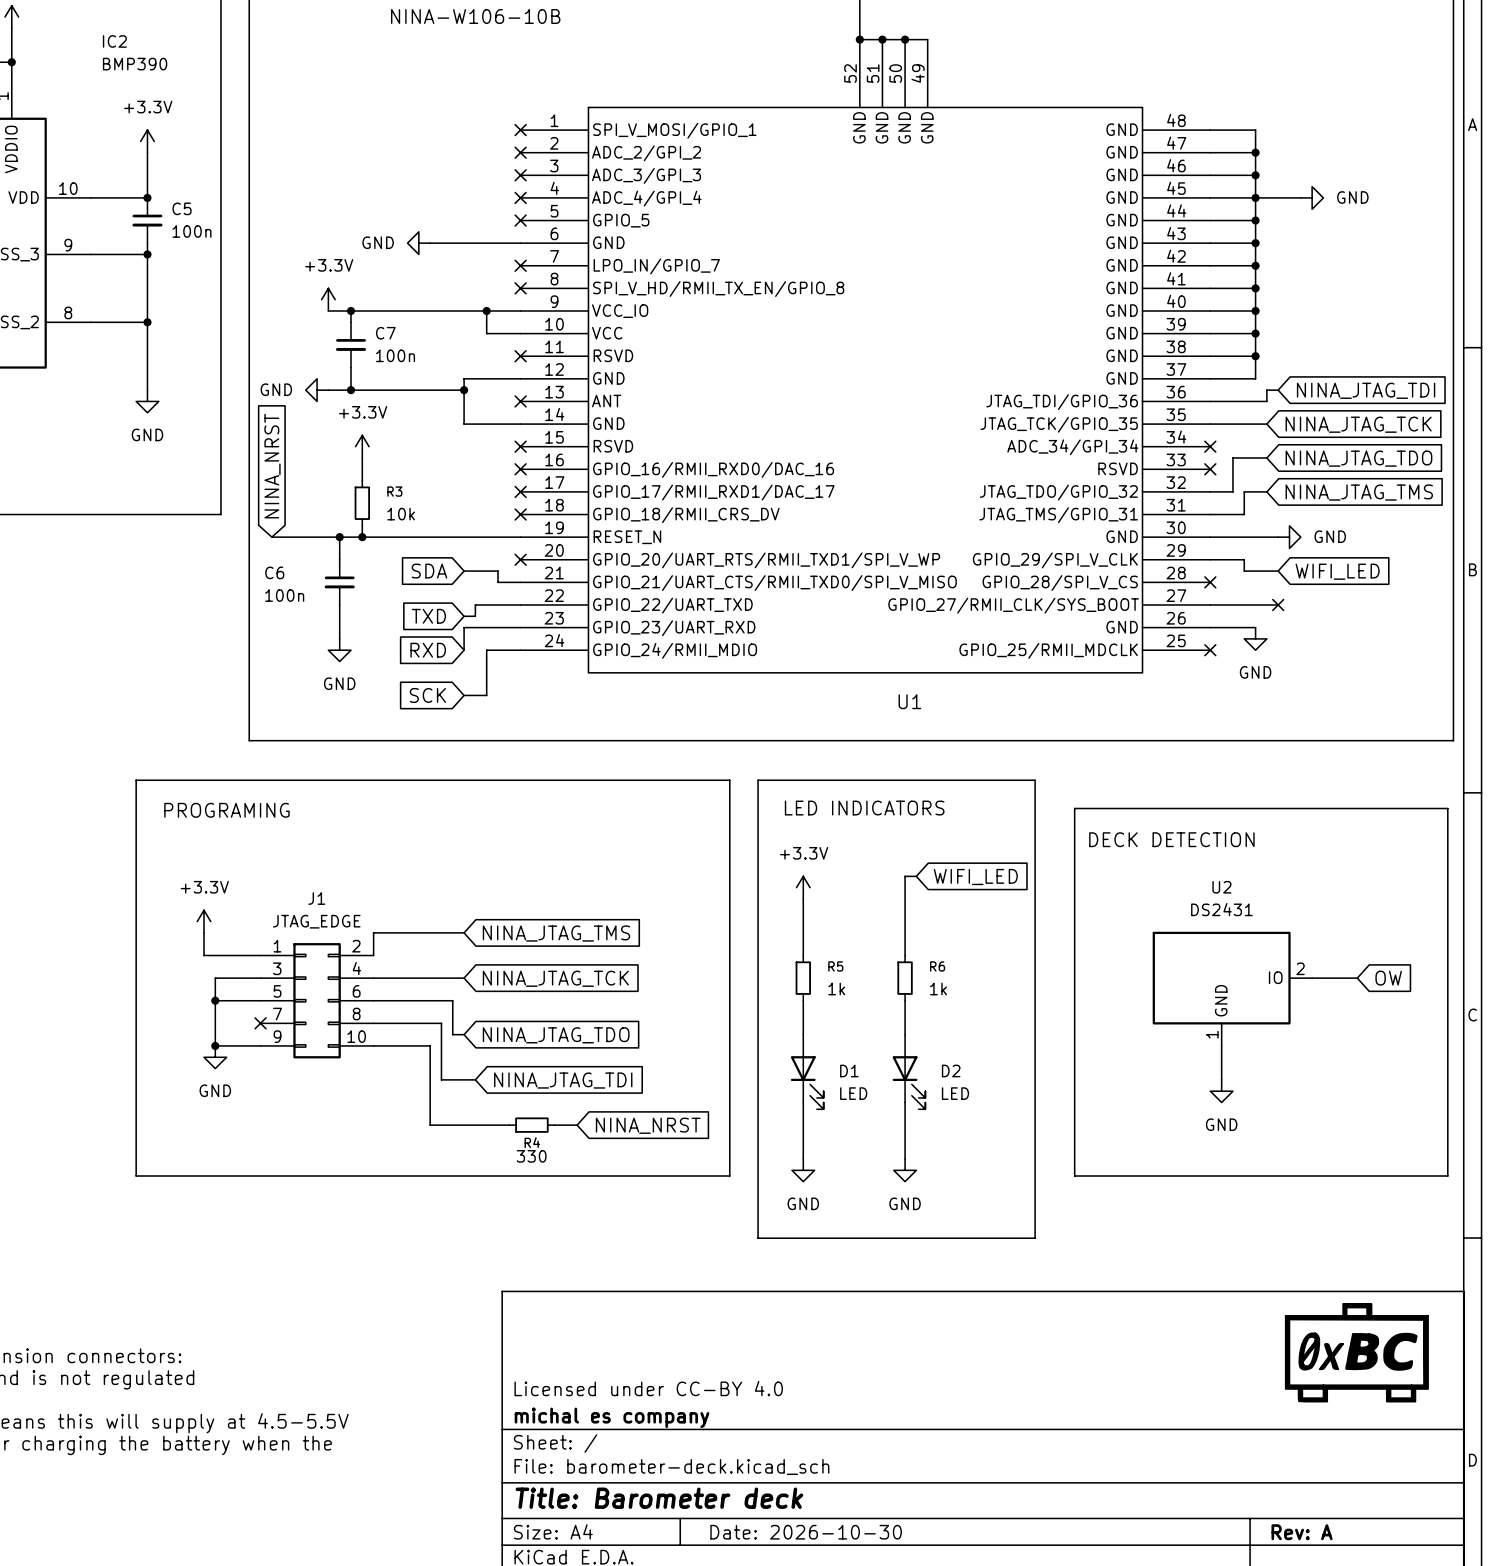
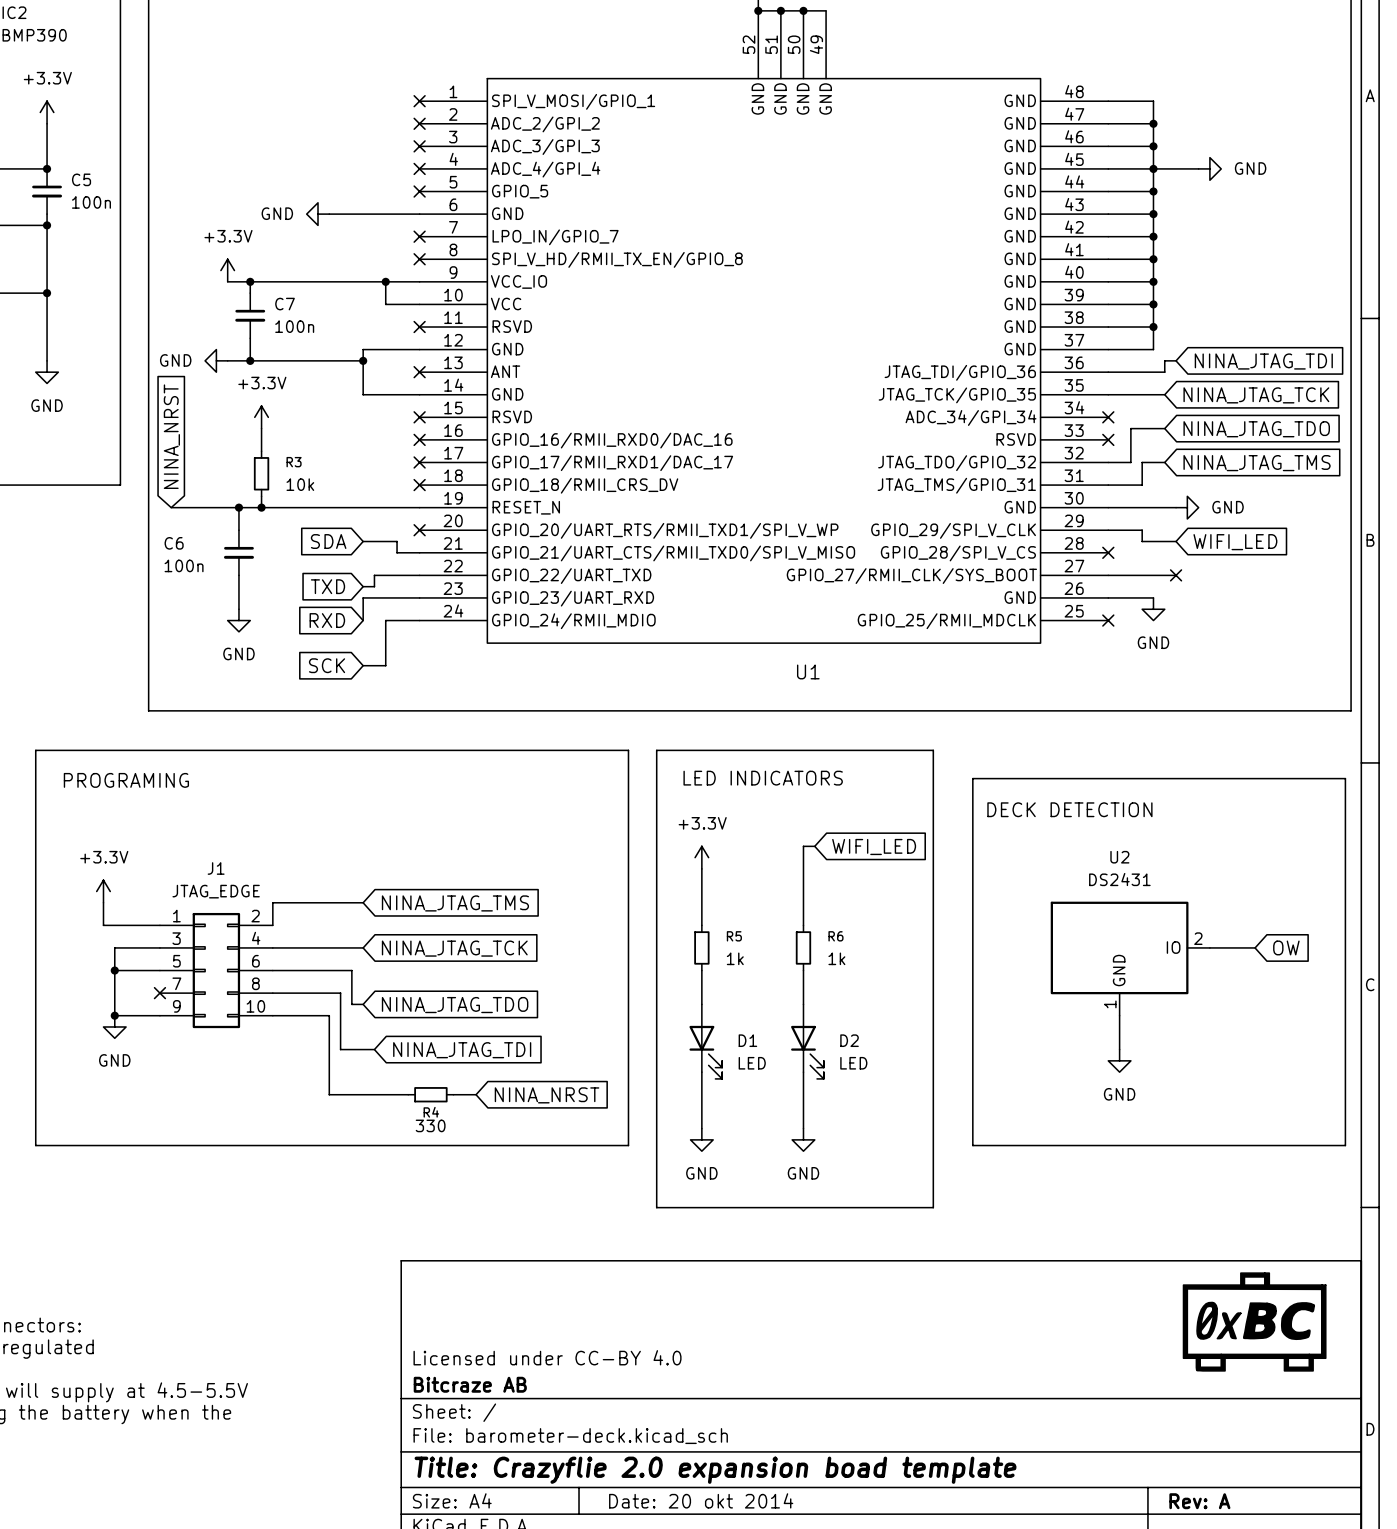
title block: michal es company (612, 1417) -> Bitcraze AB (470, 1384)
title block: Title: Barometer deck (659, 1498) -> Title: Crazyflie 2.0 expansion boad template (715, 1470)
title block: Date: 2026-10-30 (806, 1532) -> Date: 20 okt 2014 (701, 1500)

